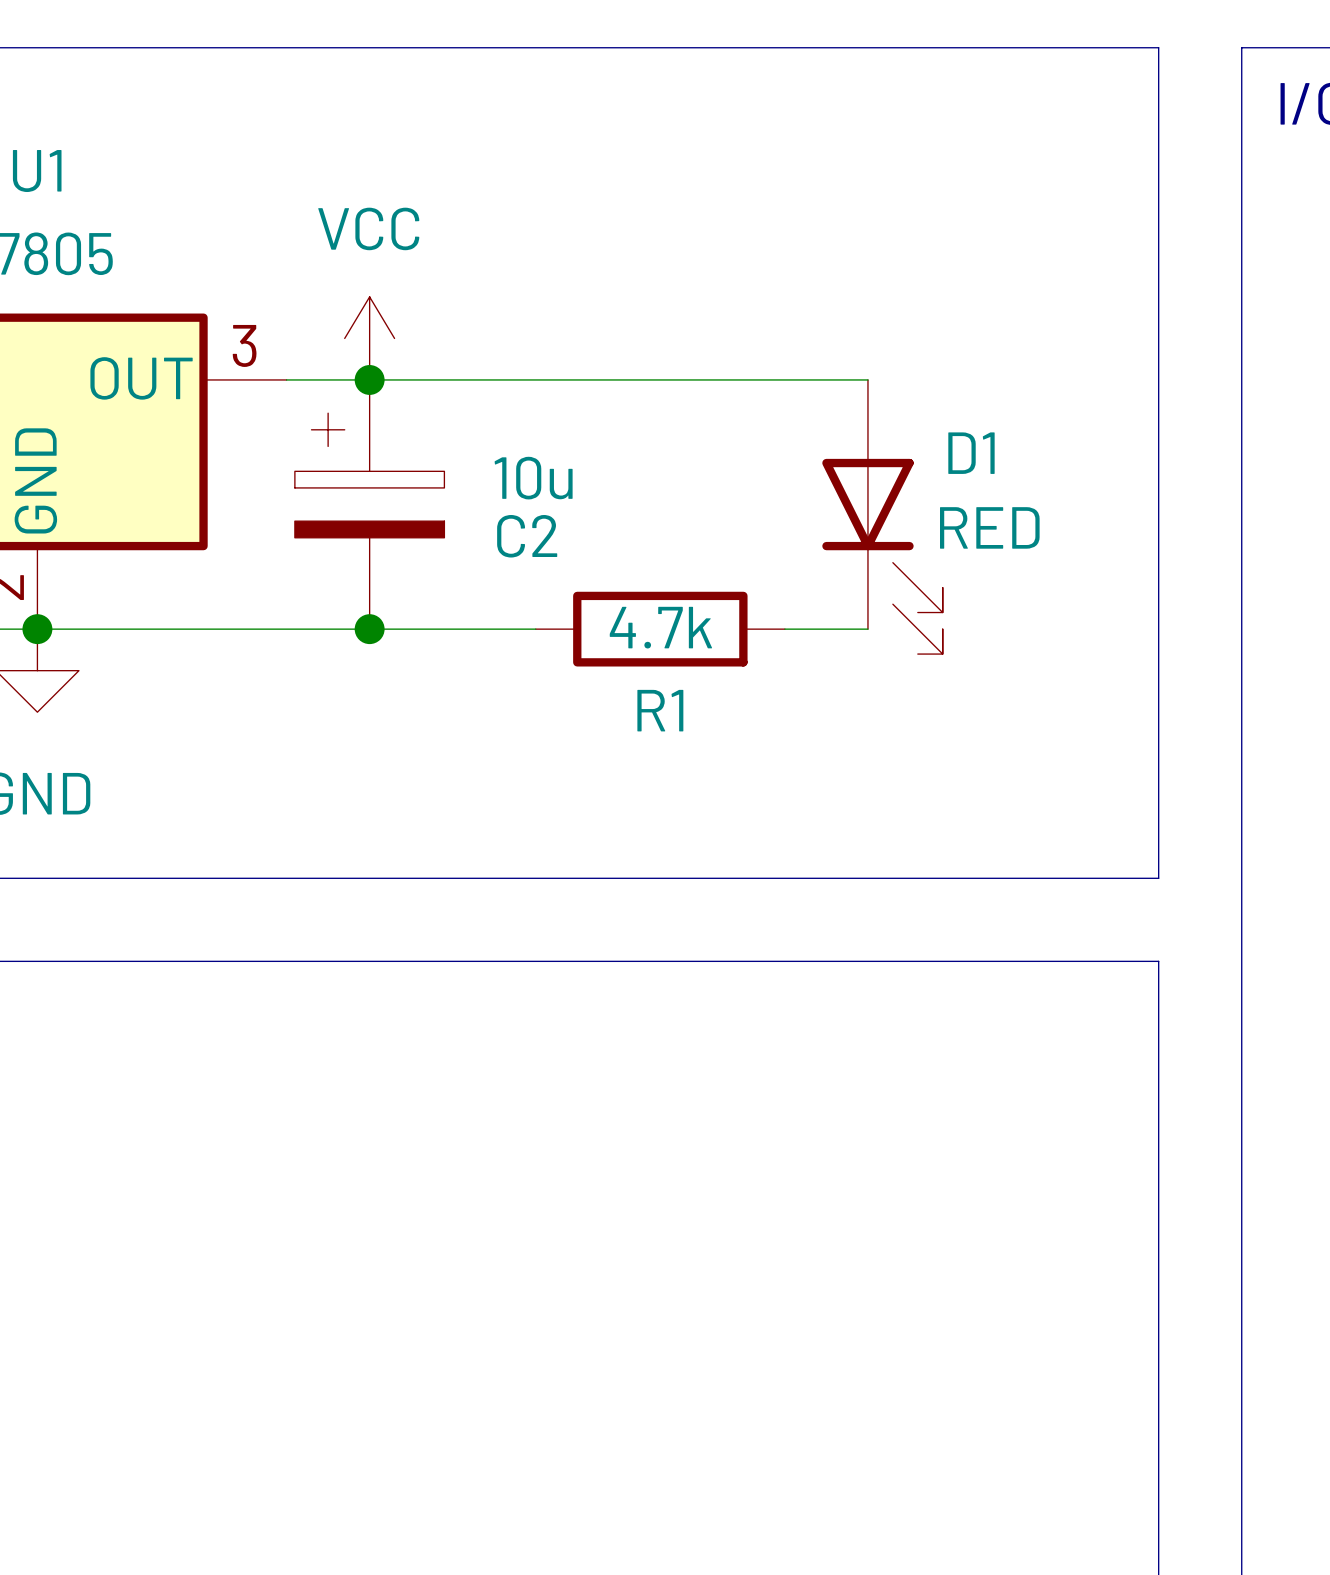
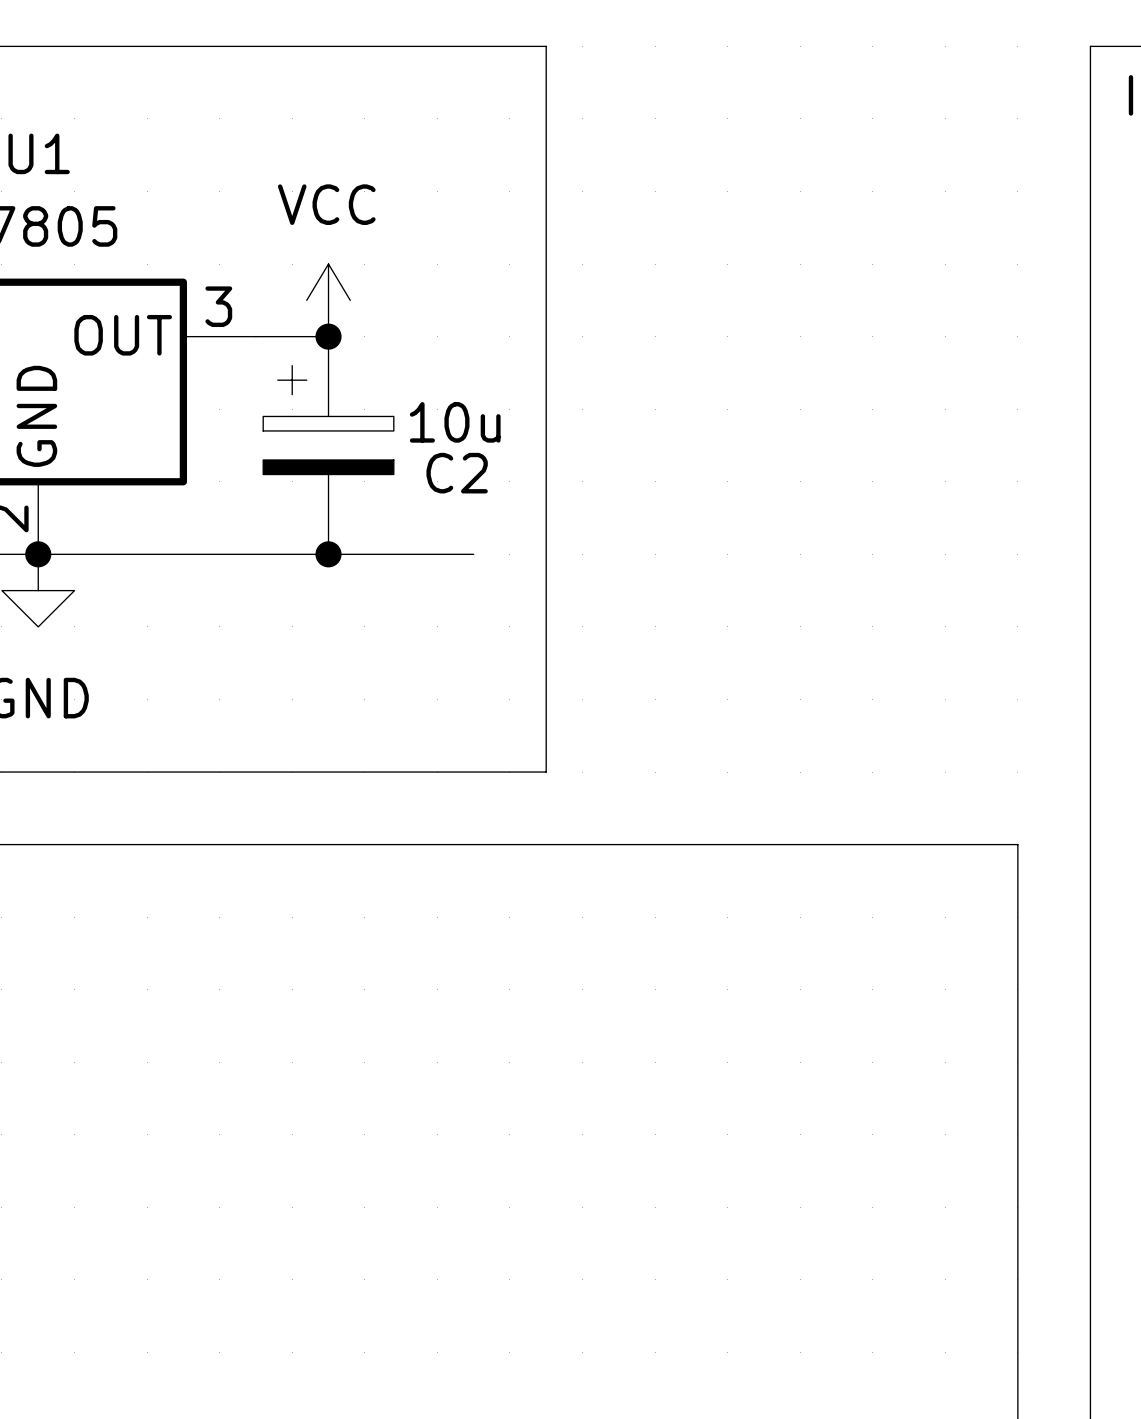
line: (618, 47) (1158, 47) (1158, 878) (618, 878) -> (546, 46) (546, 772)
wire: (369, 379) (867, 379) -> none
D1: RED (882, 517) -> none
R1: 4.7k (660, 629) -> none
wire: (784, 629) (867, 629) -> none

